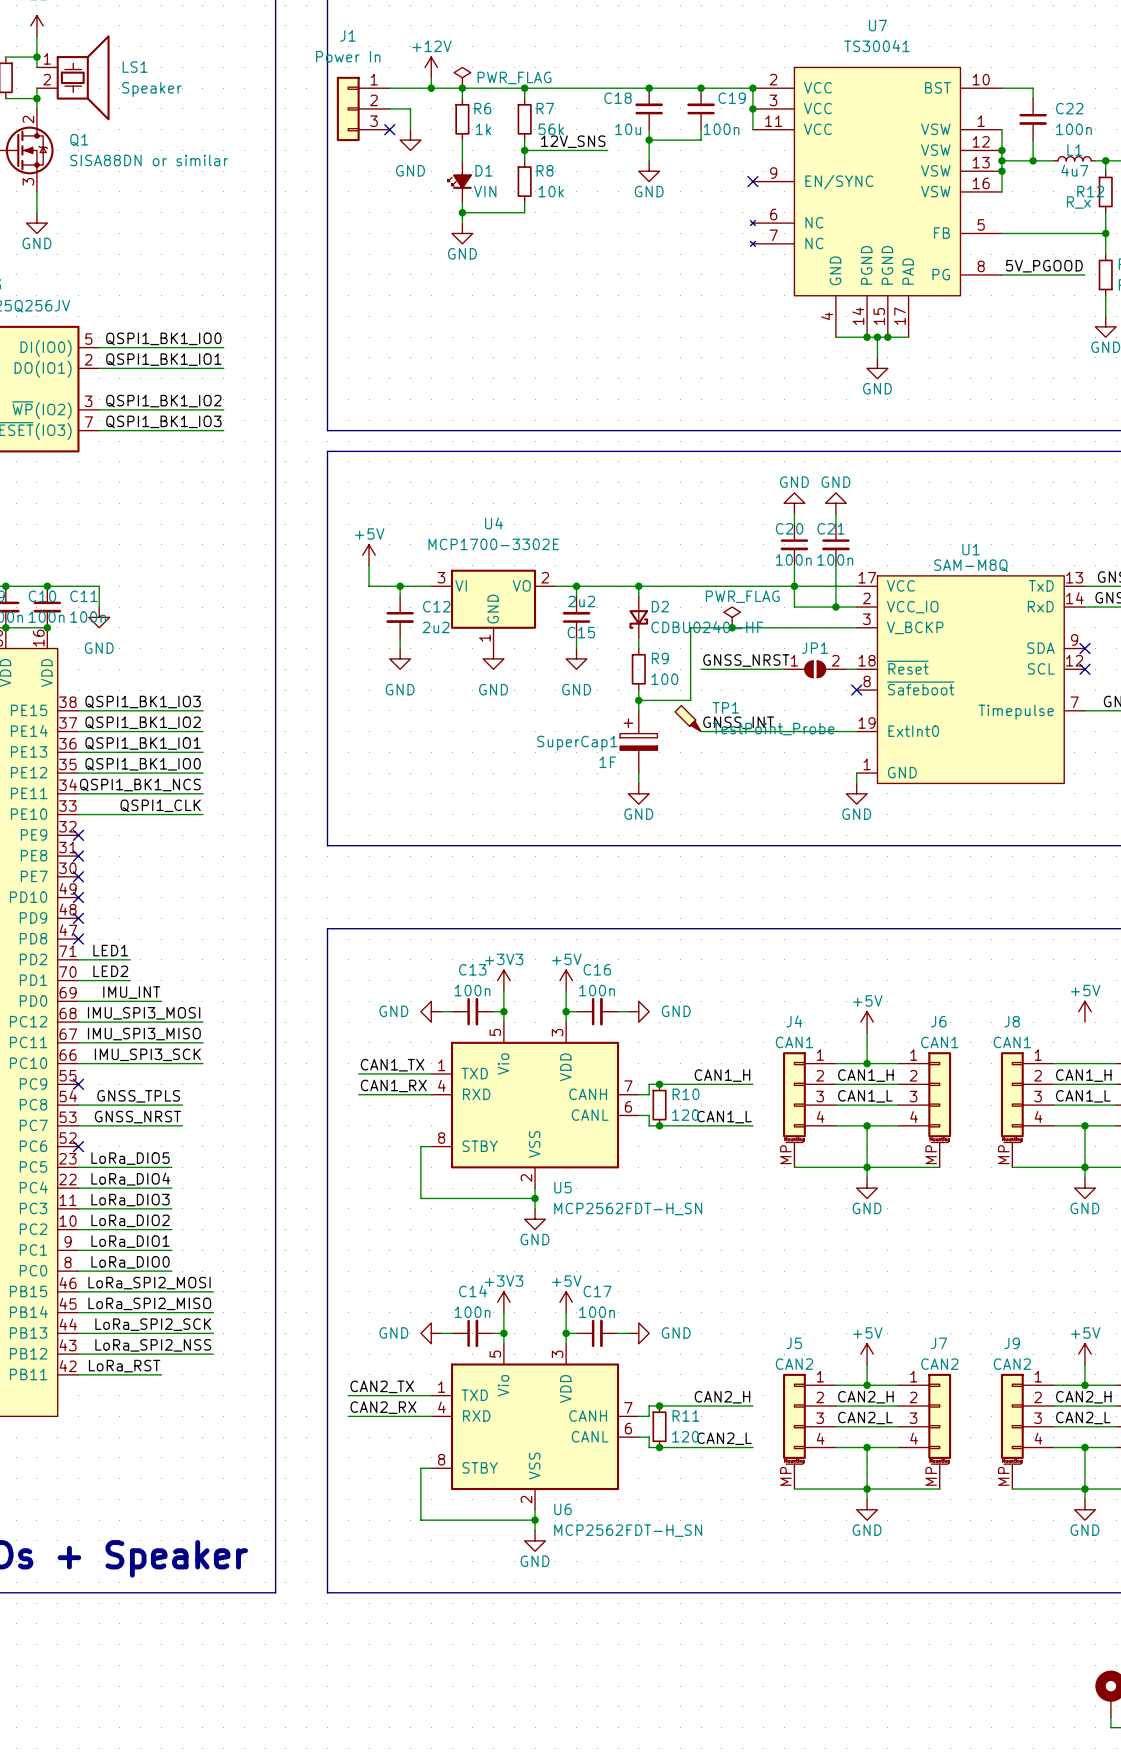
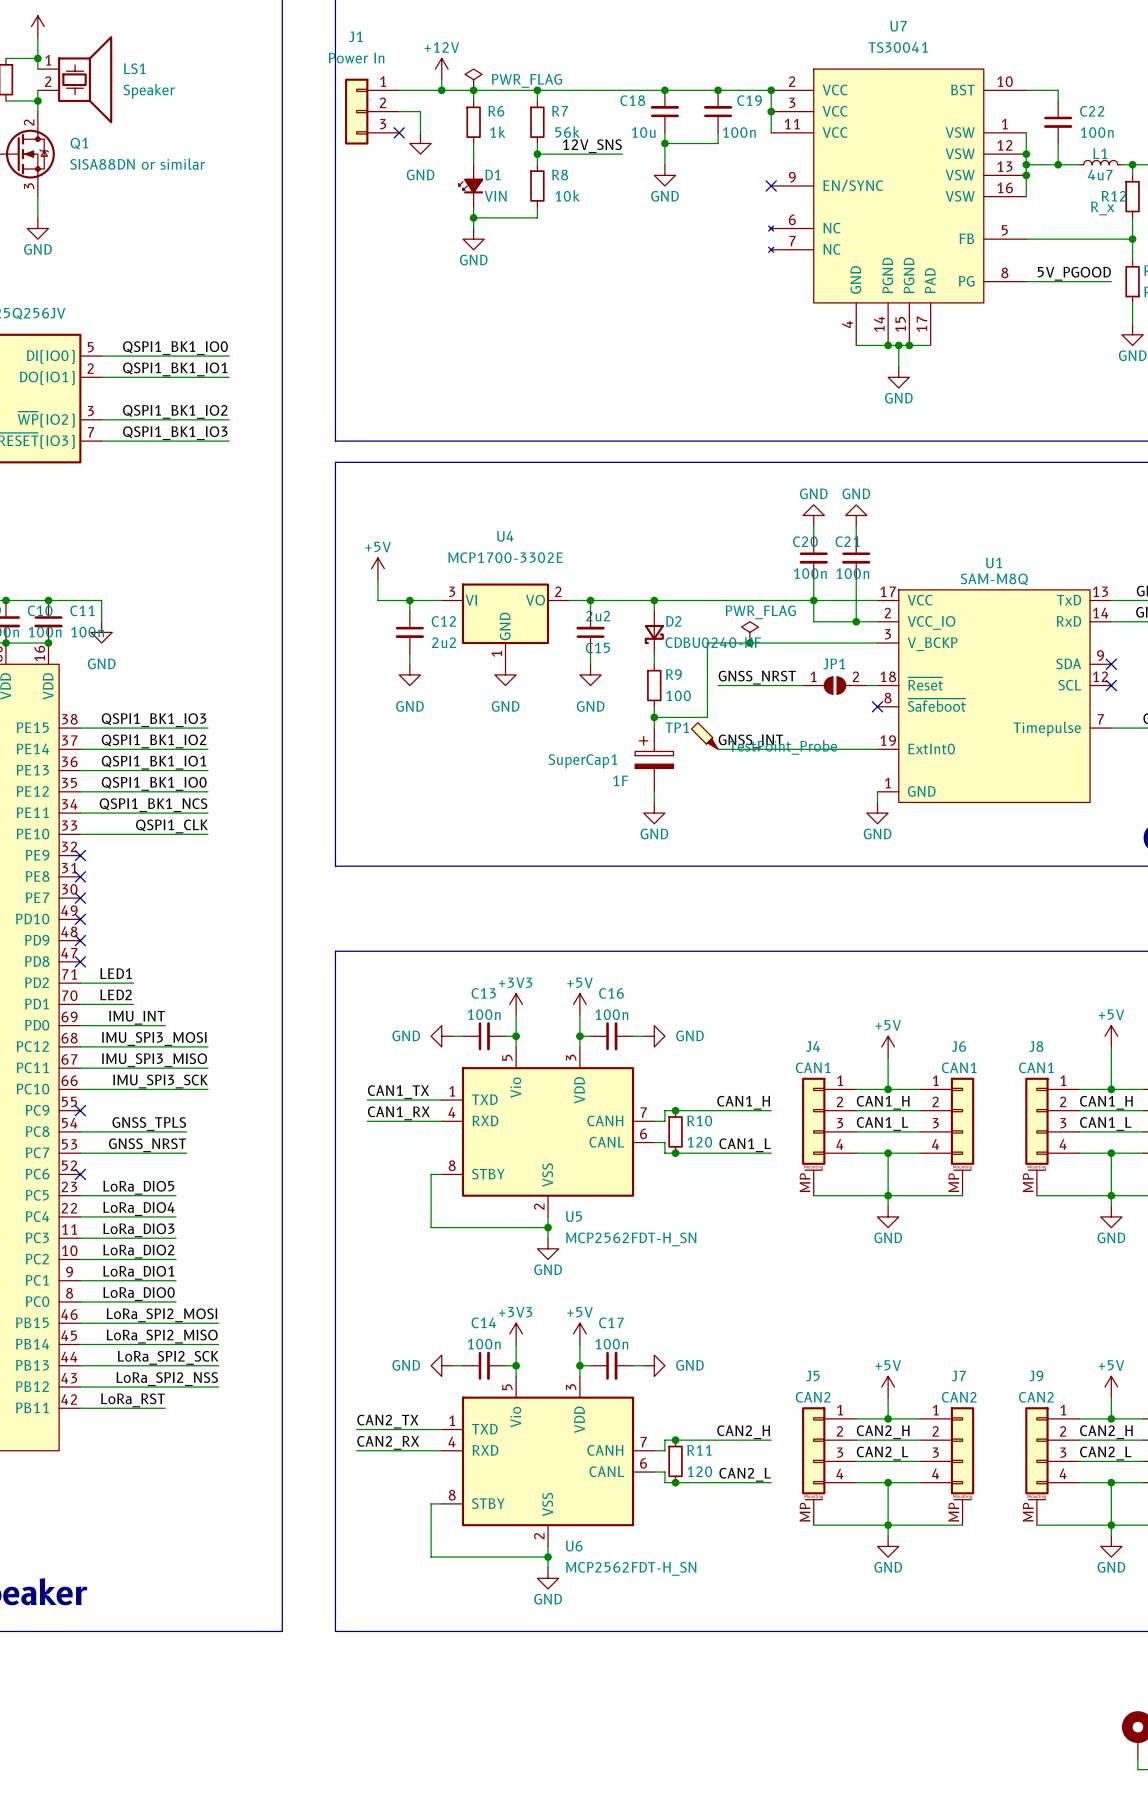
TP1 name position: TP1 (725, 707) -> TP1 (677, 727)
wire: none -> (1111, 1046) (1111, 1089)
junction: none -> (1111, 1089)

